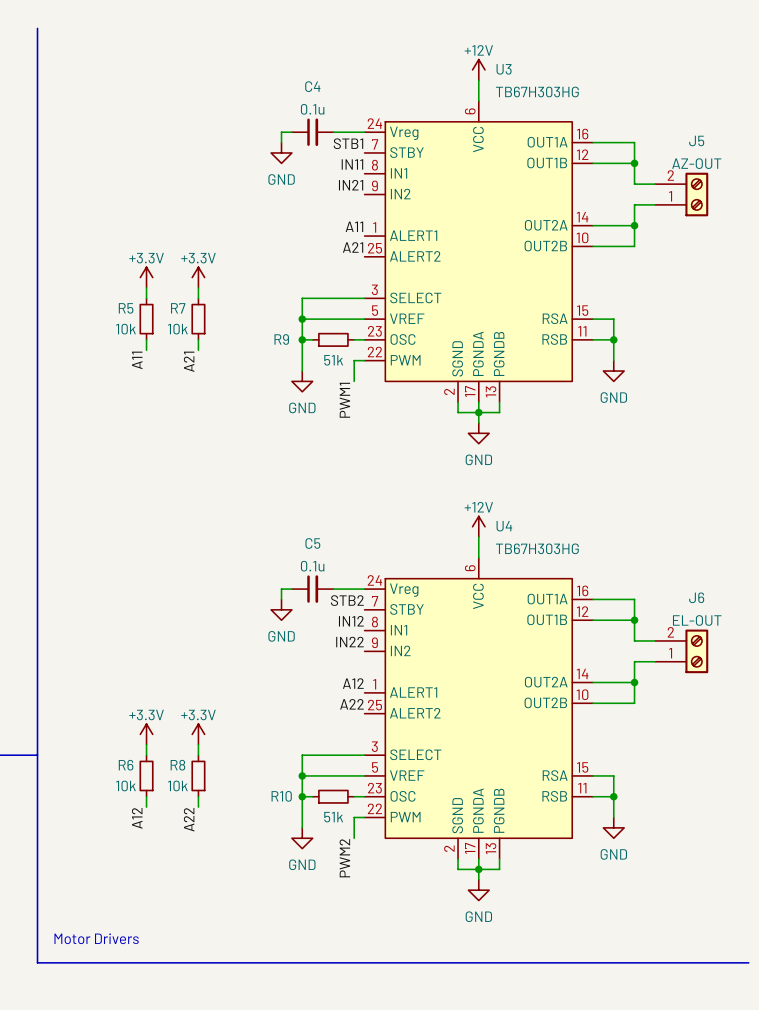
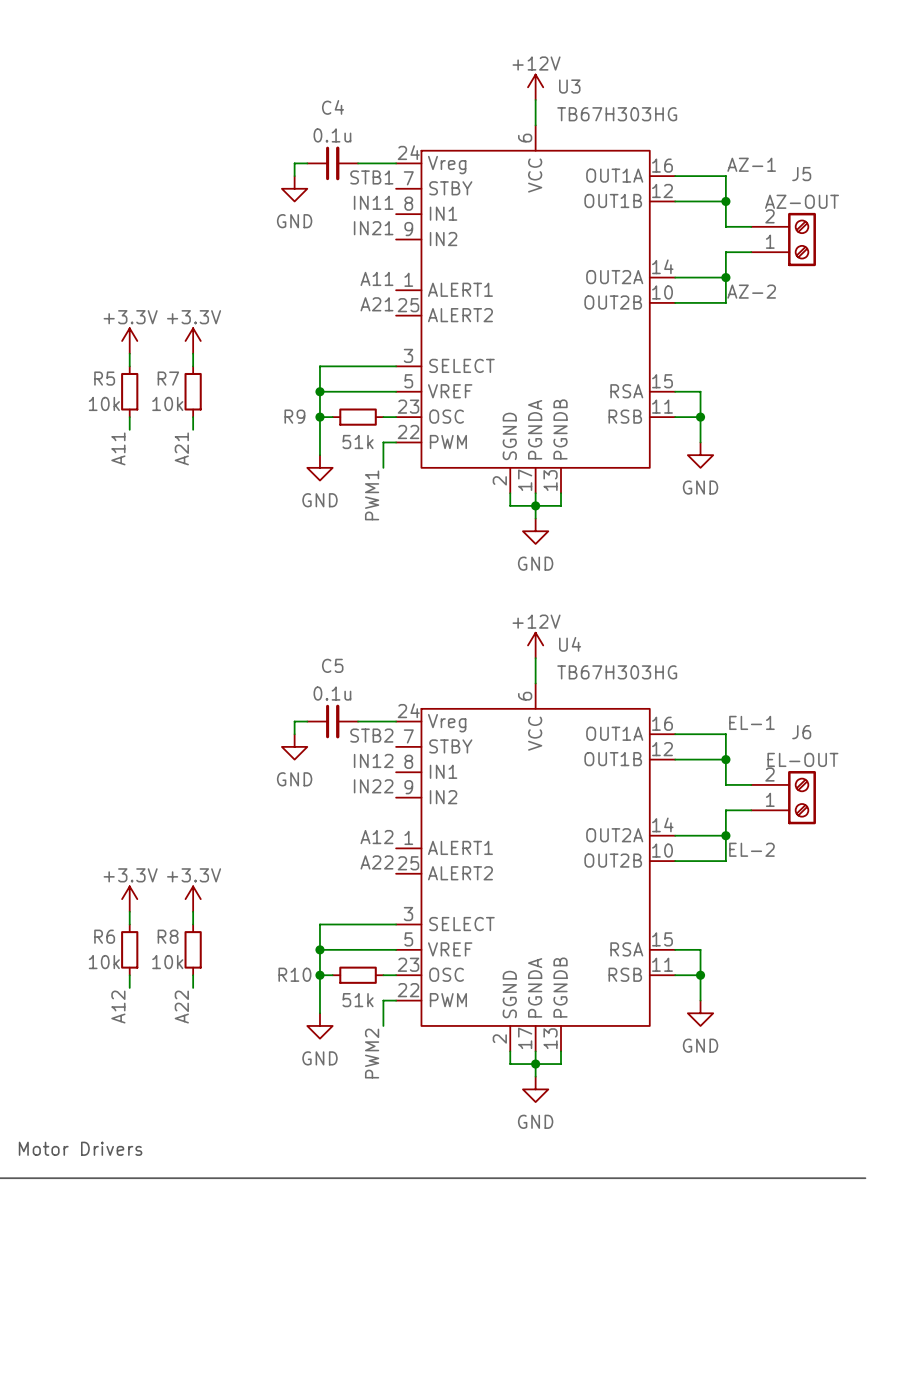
label: none -> AZ-1 (751, 164)
label: none -> AZ-2 (751, 291)
label: none -> EL-1 (751, 722)
label: none -> EL-2 (751, 849)

